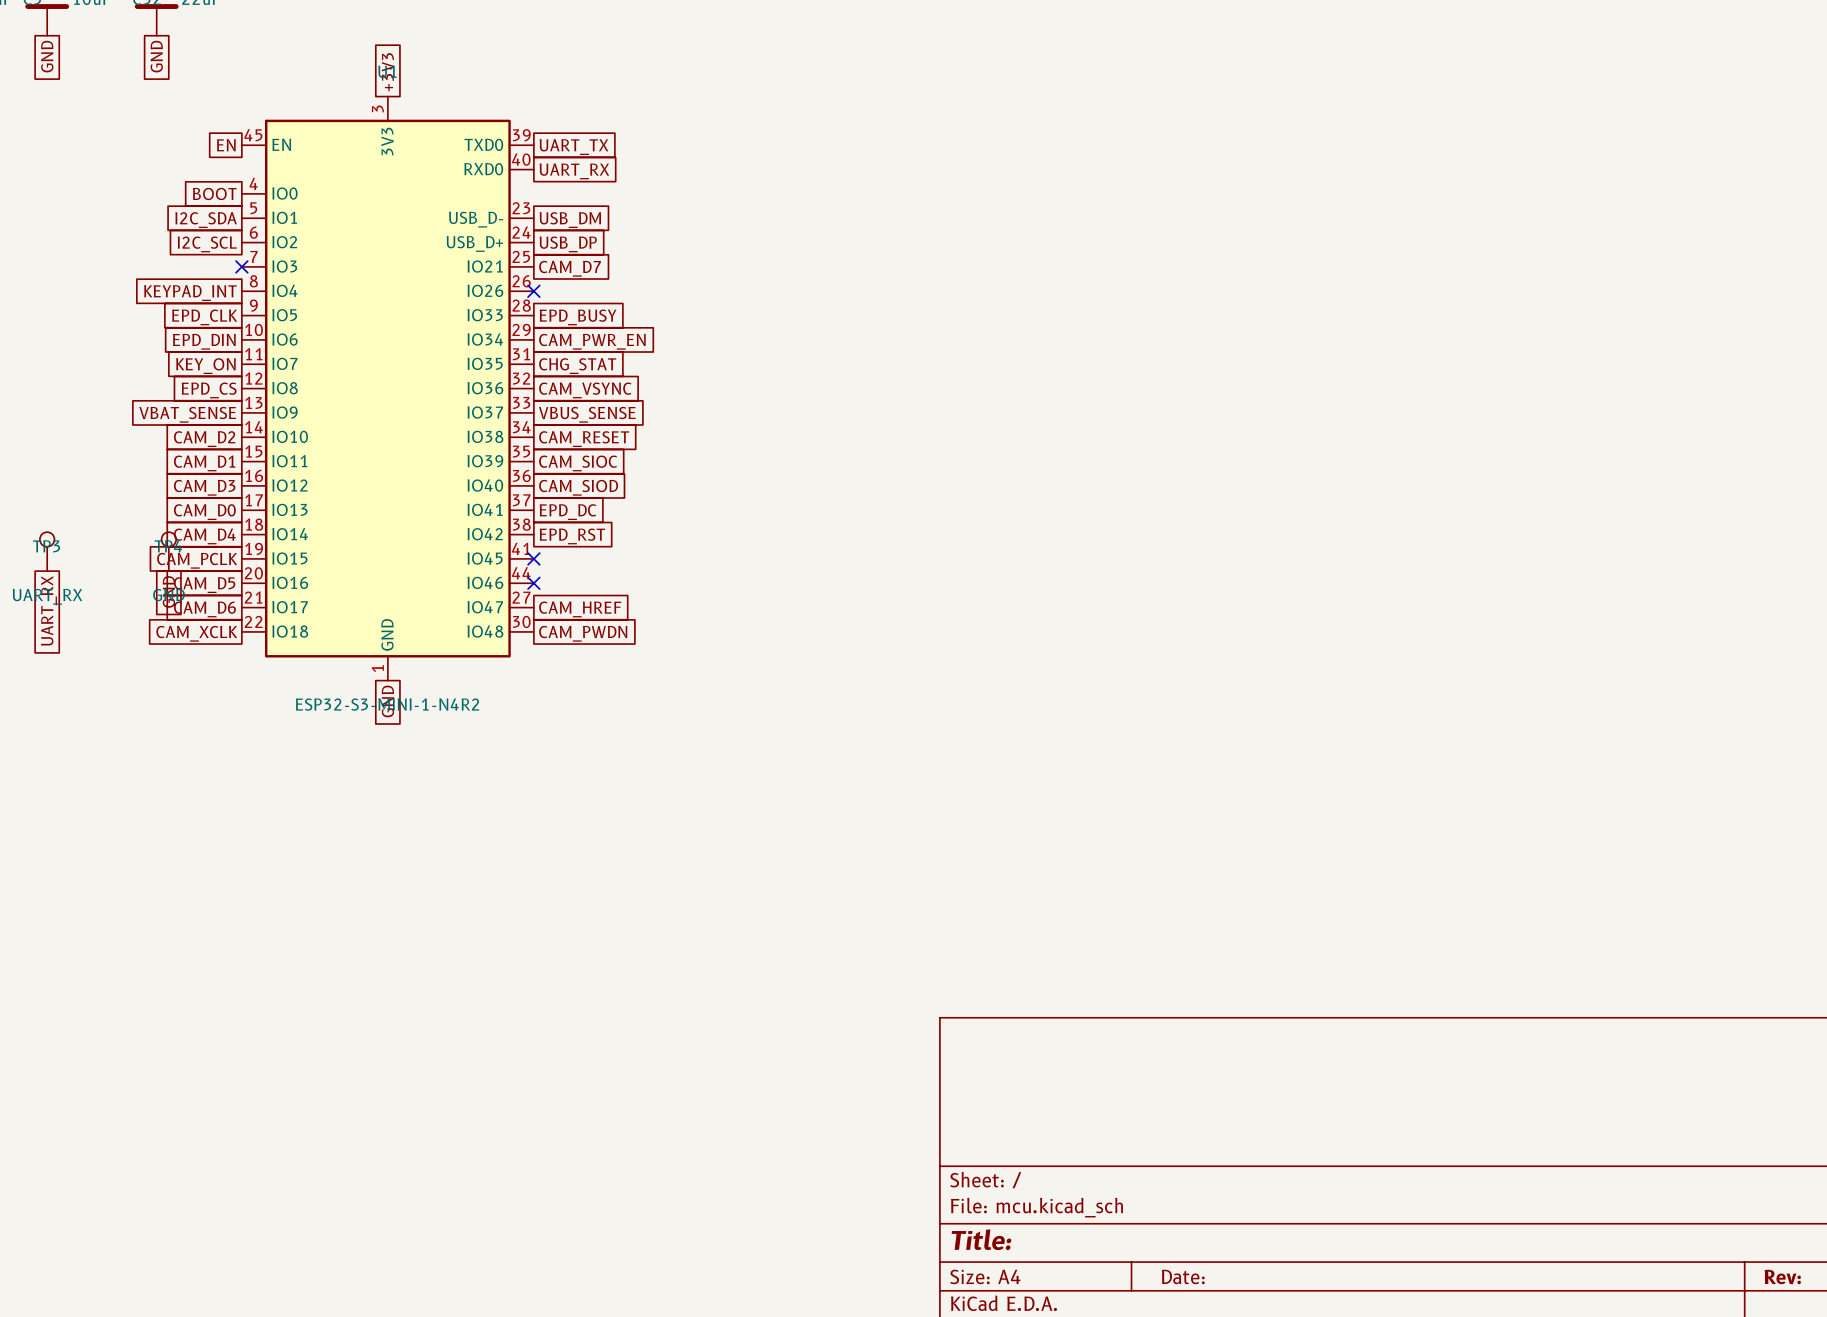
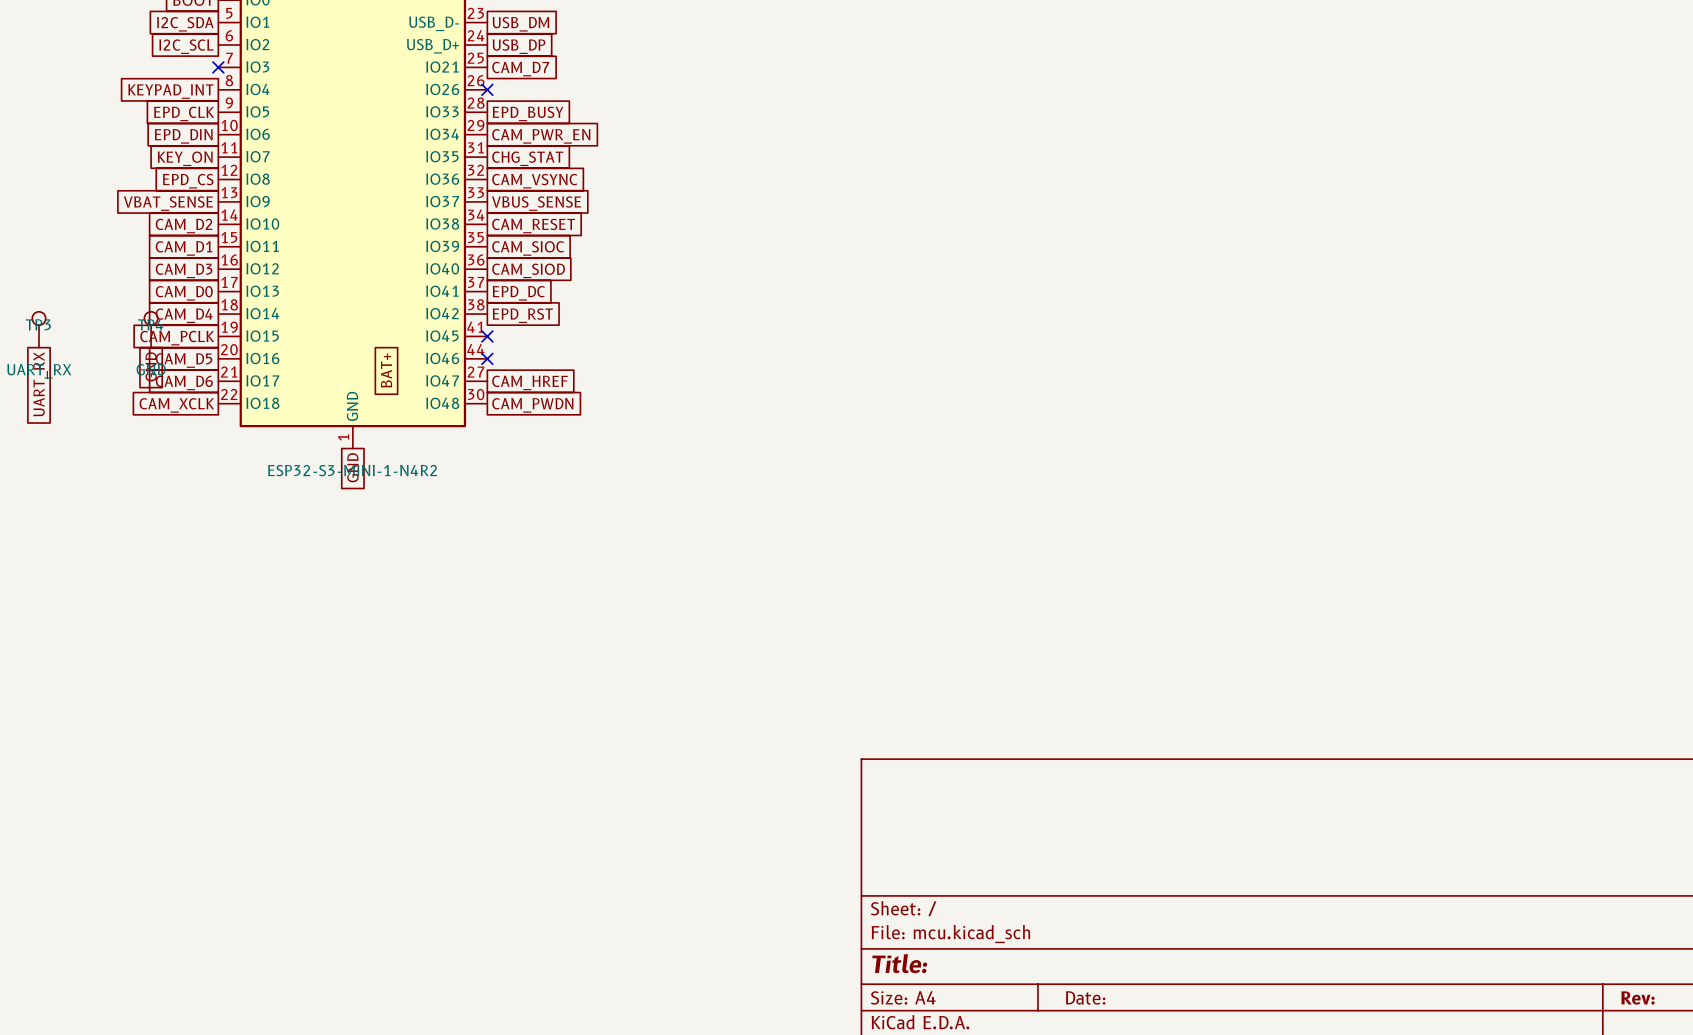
global label: none -> BAT+ (386, 370)

